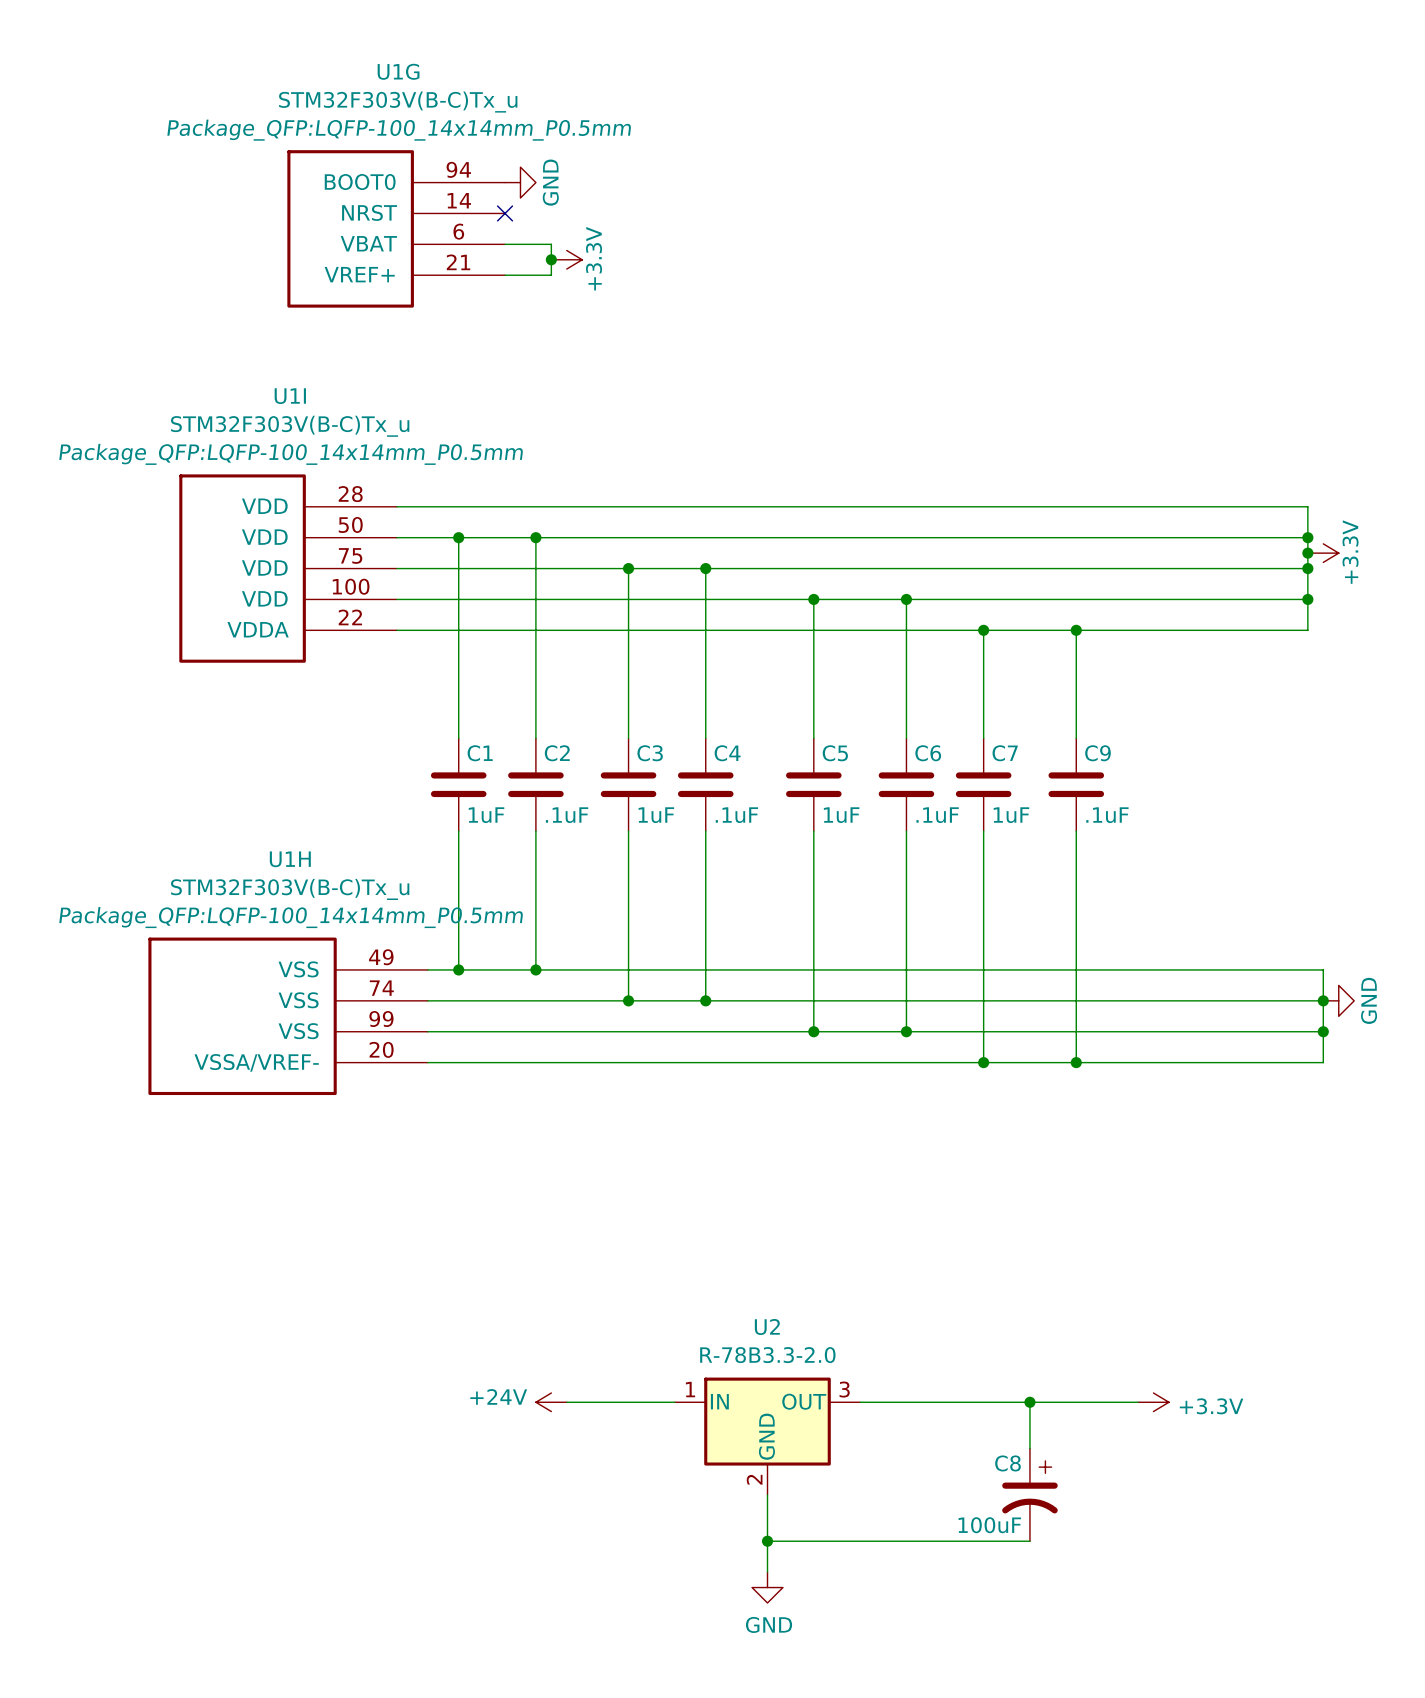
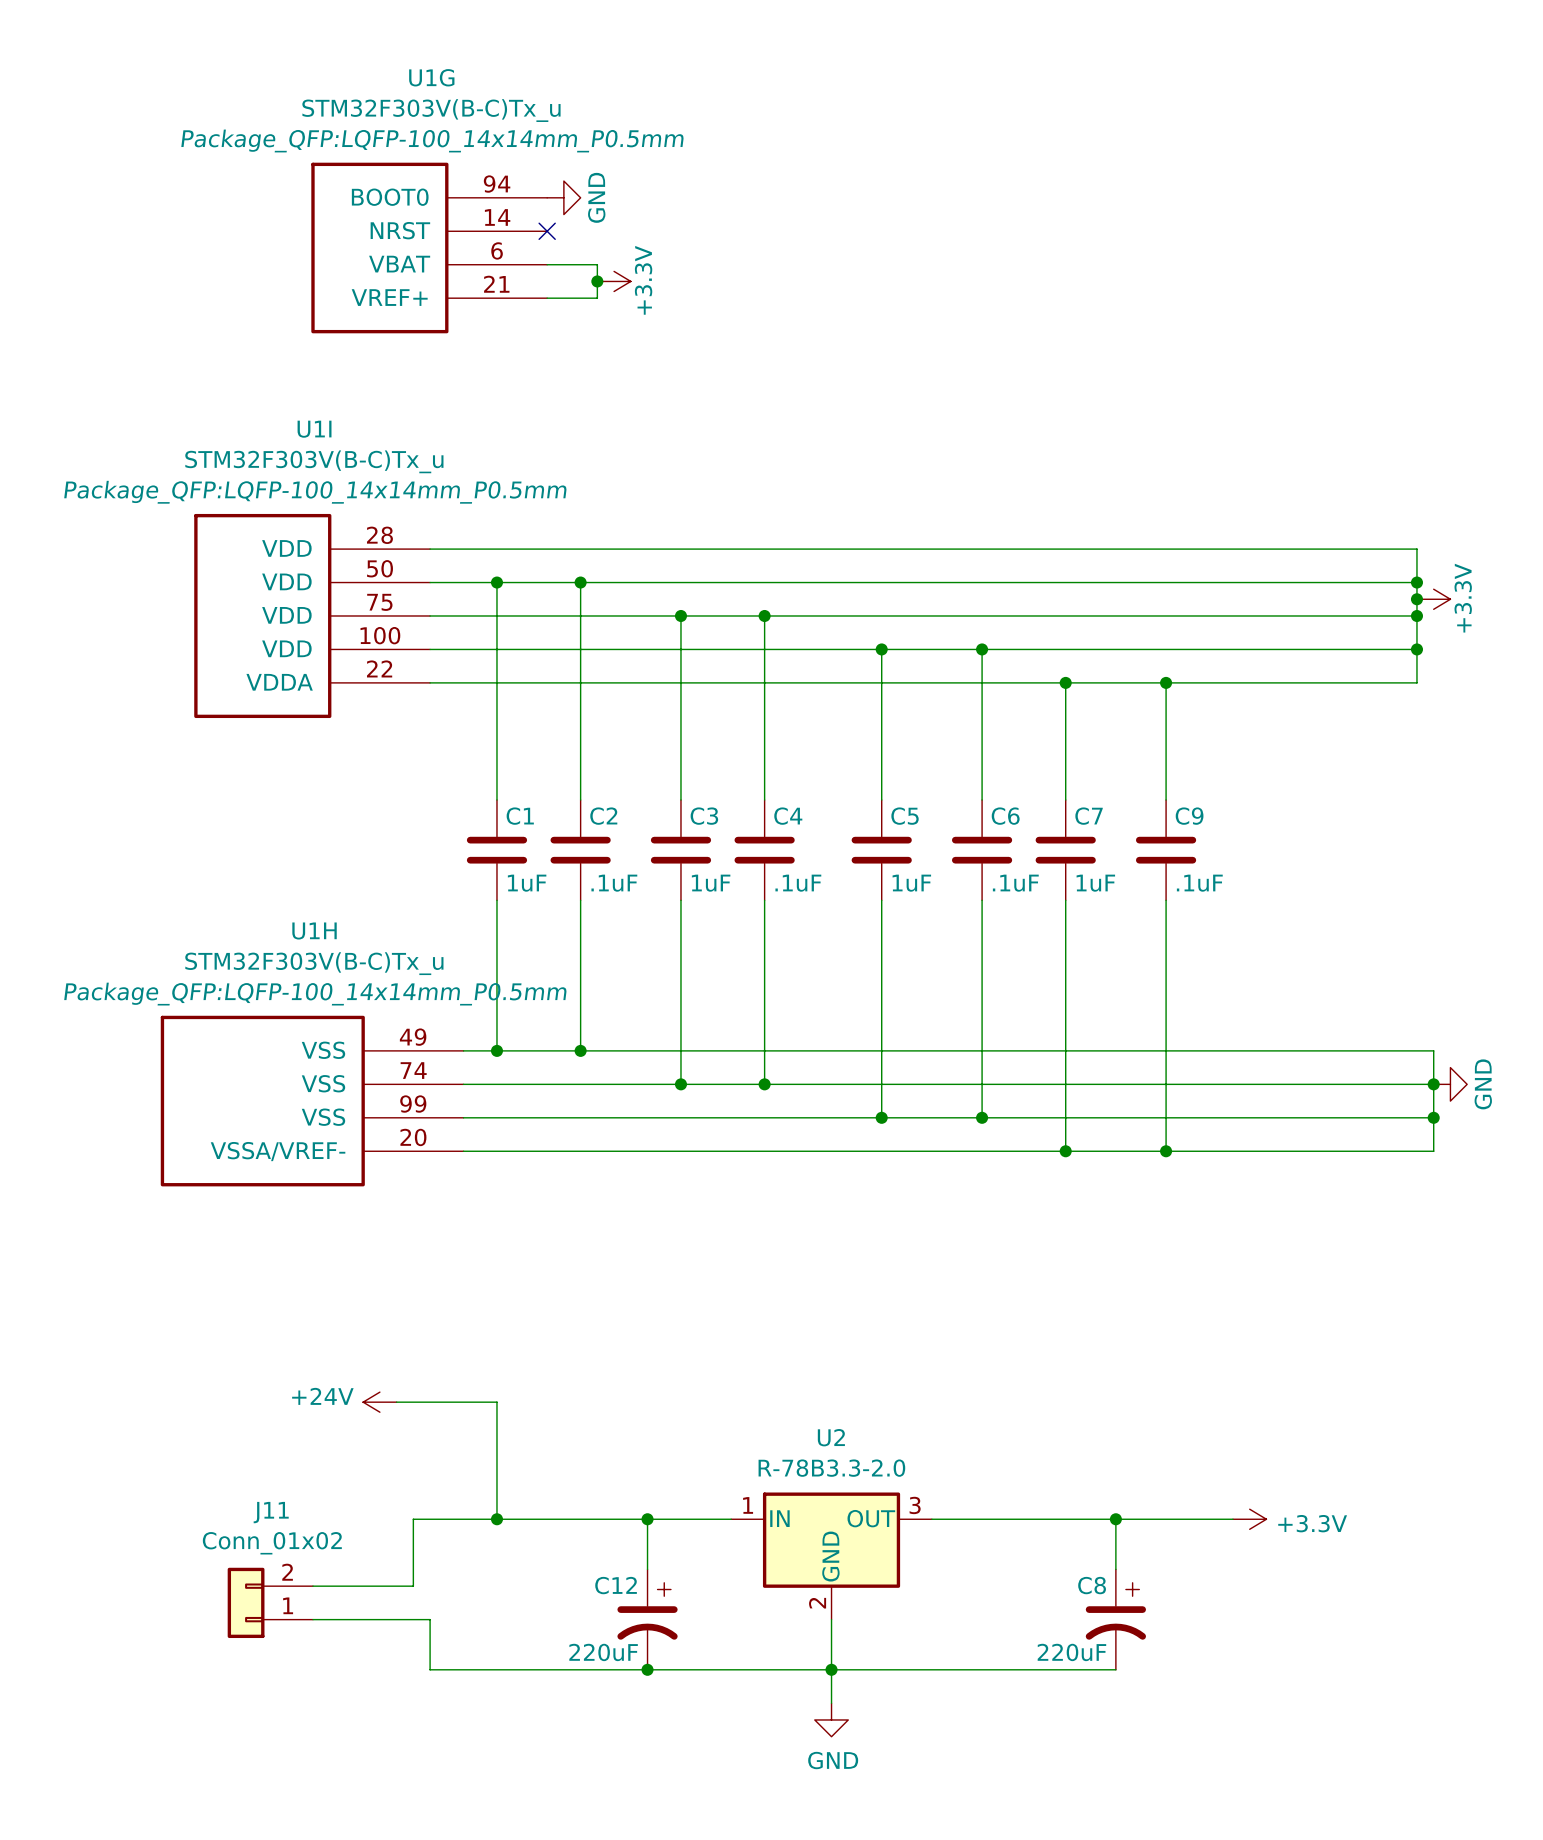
wire: none -> (396, 1402) (496, 1402) (496, 1519)
junction: none -> (496, 1519)
power symbol position: +24V (551, 1402) -> +24V (379, 1402)
wire: none -> (614, 1519) (413, 1519) (413, 1586) (312, 1586)
wire: none -> (647, 1519) (647, 1569)
junction: none -> (647, 1519)
J11: none -> Conn_01x02 (270, 1602)
wire: none -> (312, 1619) (430, 1619) (430, 1669) (831, 1669)
C12: none -> 220uF (647, 1619)
C8 value: 100uF (989, 1525) -> 220uF (1071, 1652)
junction: none -> (647, 1669)

